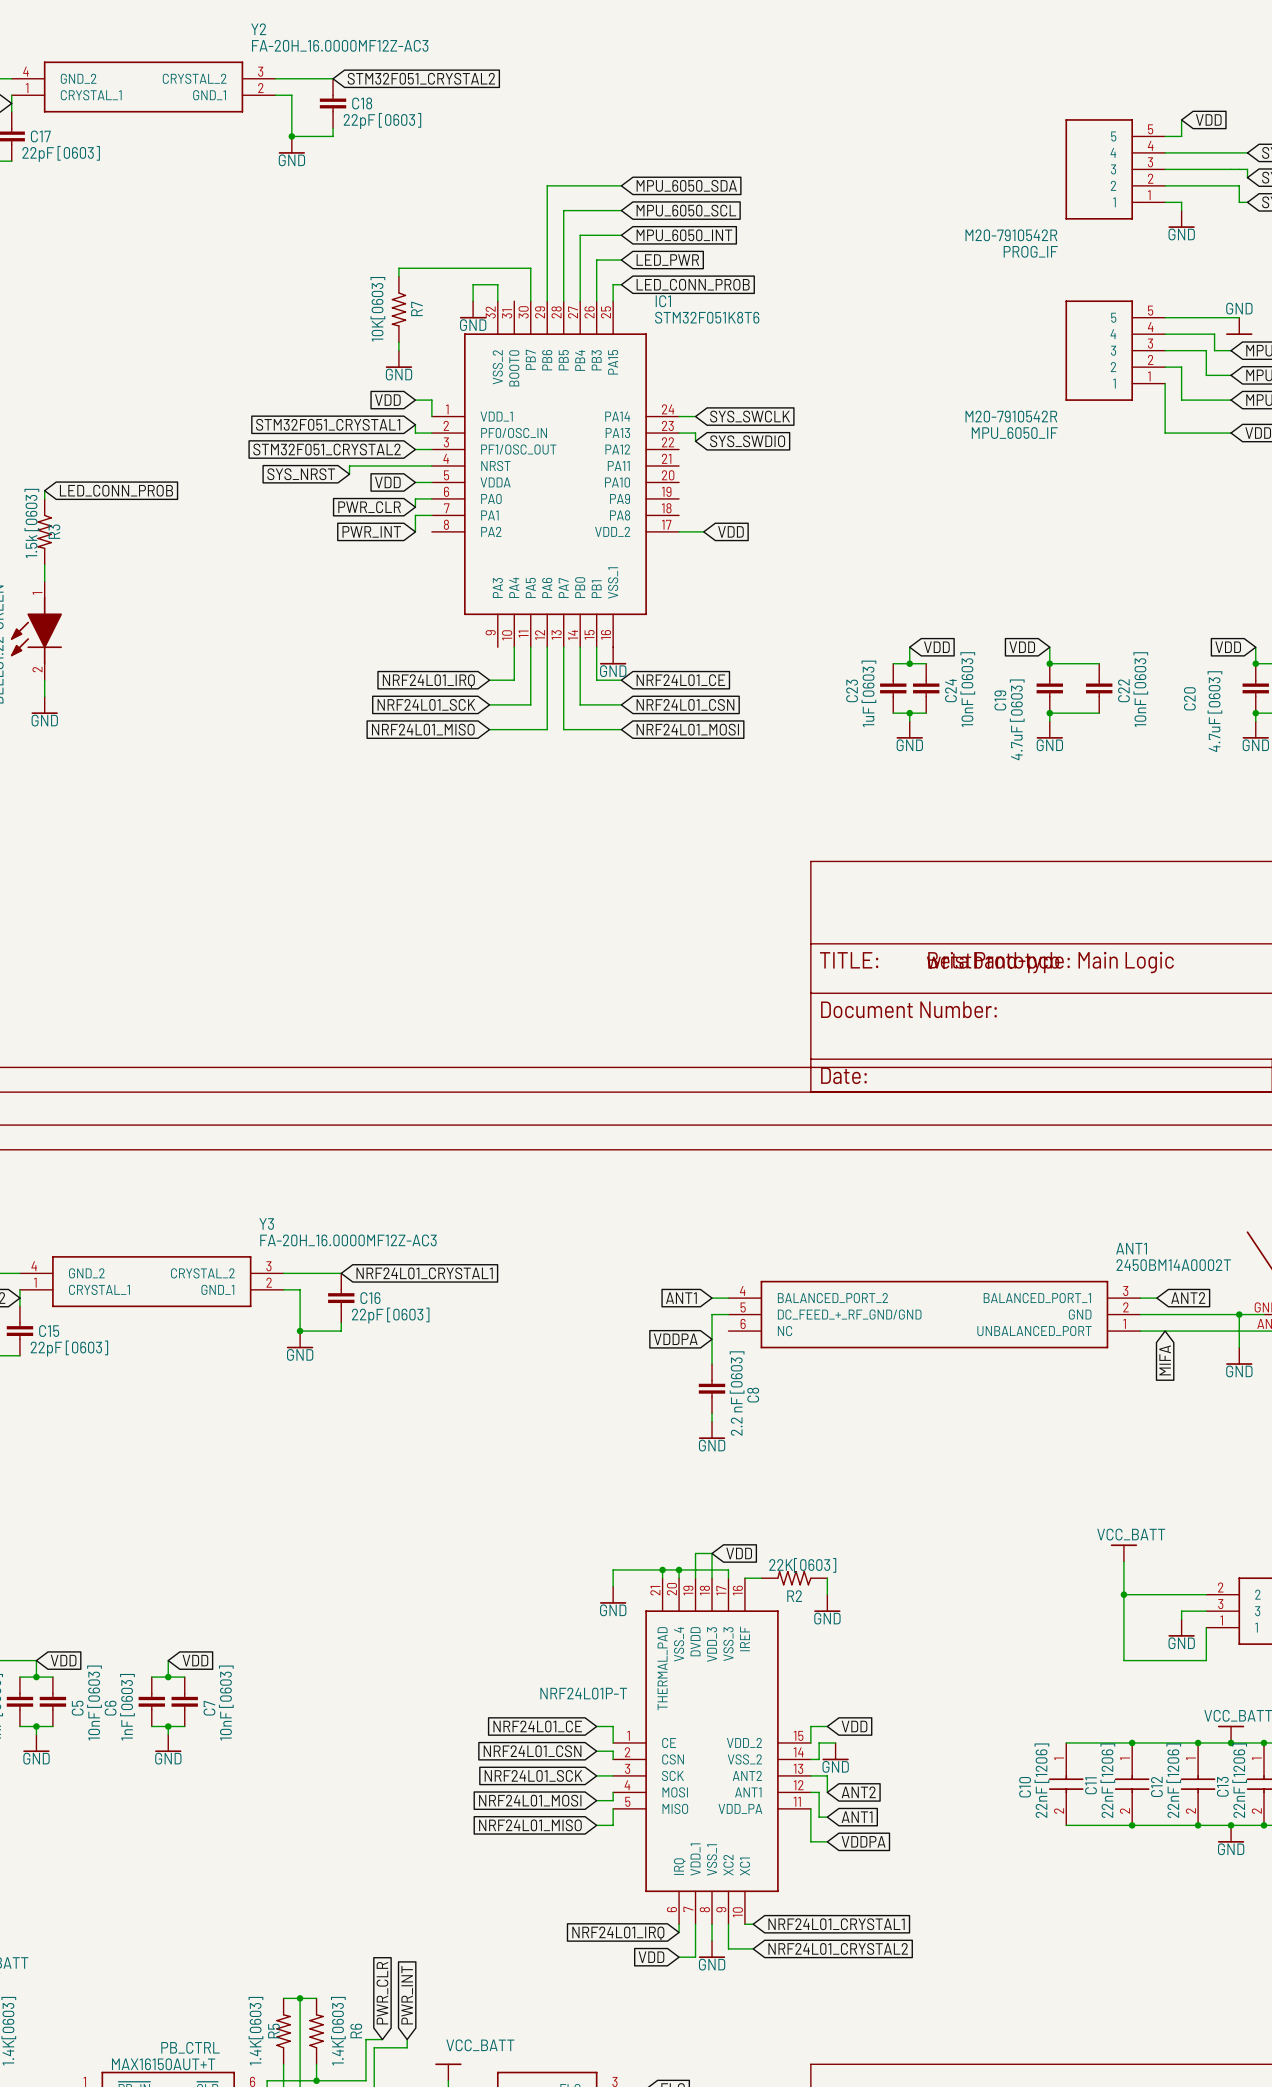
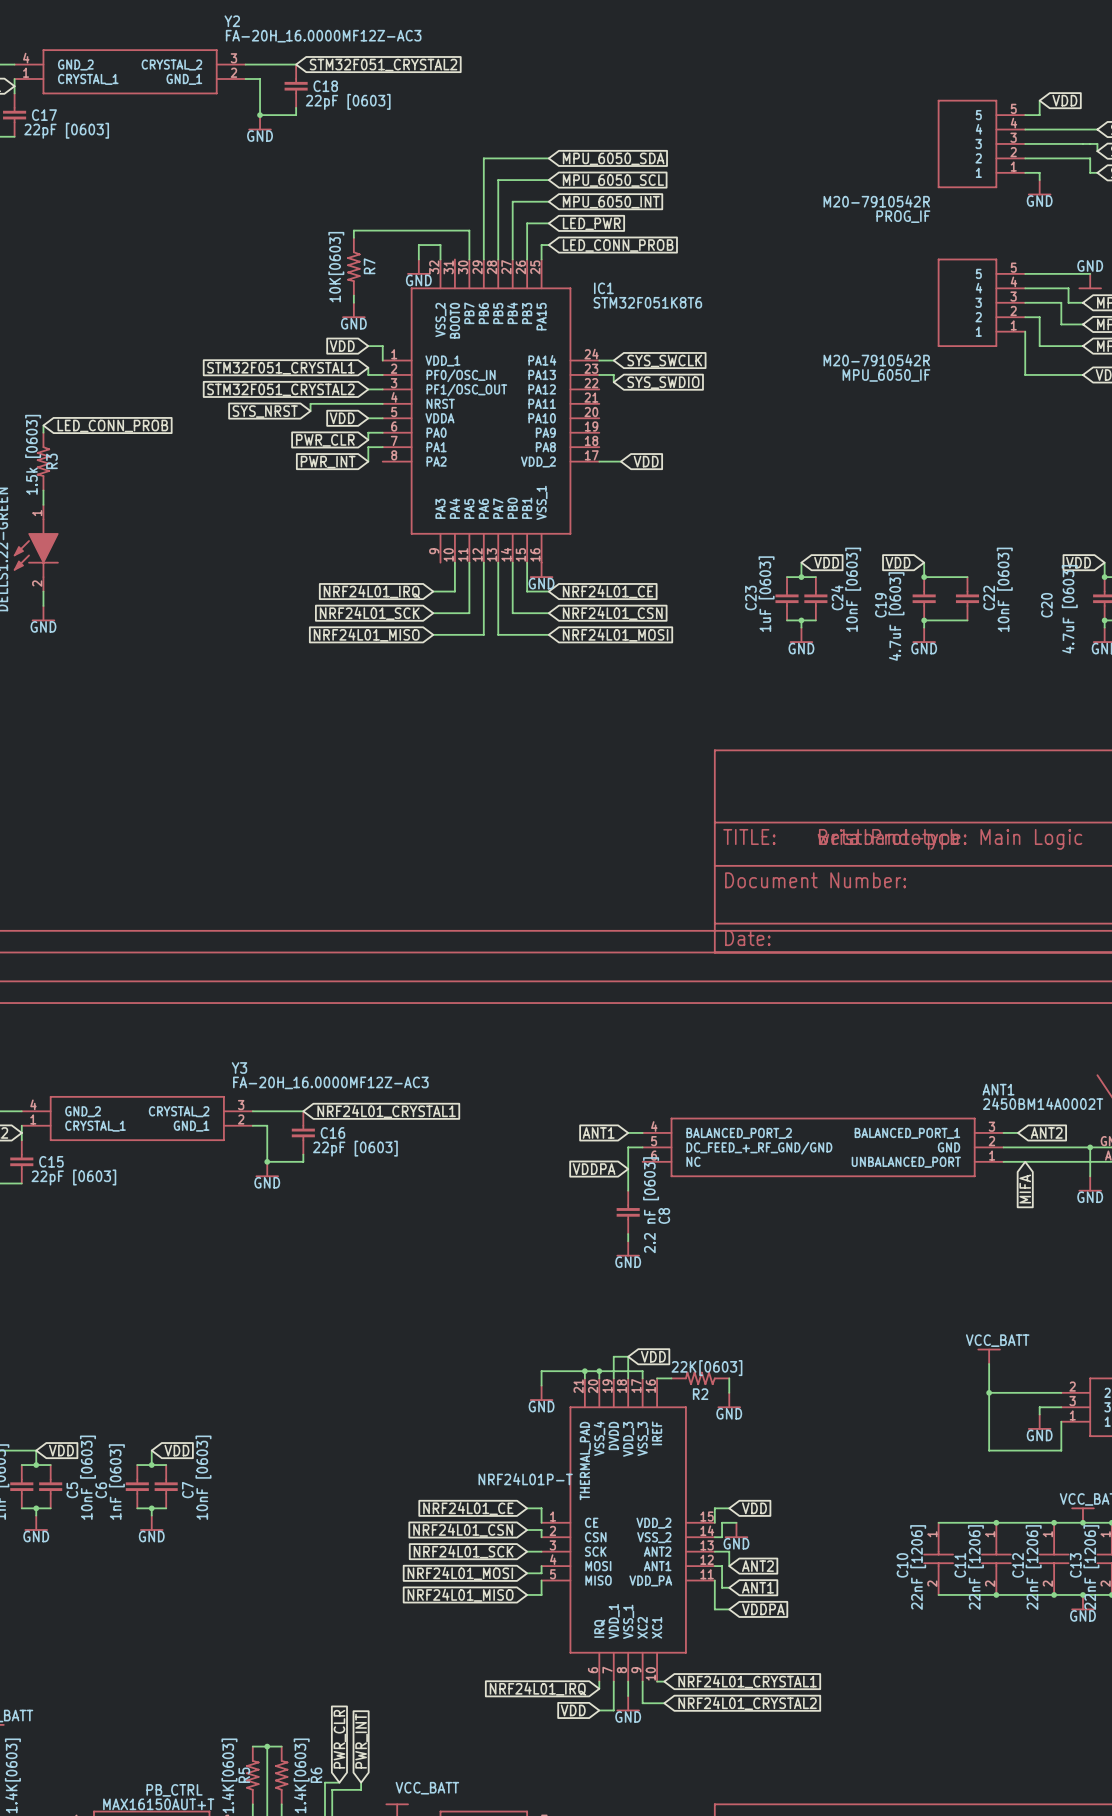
IC1 name position: IC1 (663, 301) -> IC1 (603, 288)
IC1 value position: STM32F051K8T6 (707, 317) -> STM32F051K8T6 (647, 302)

